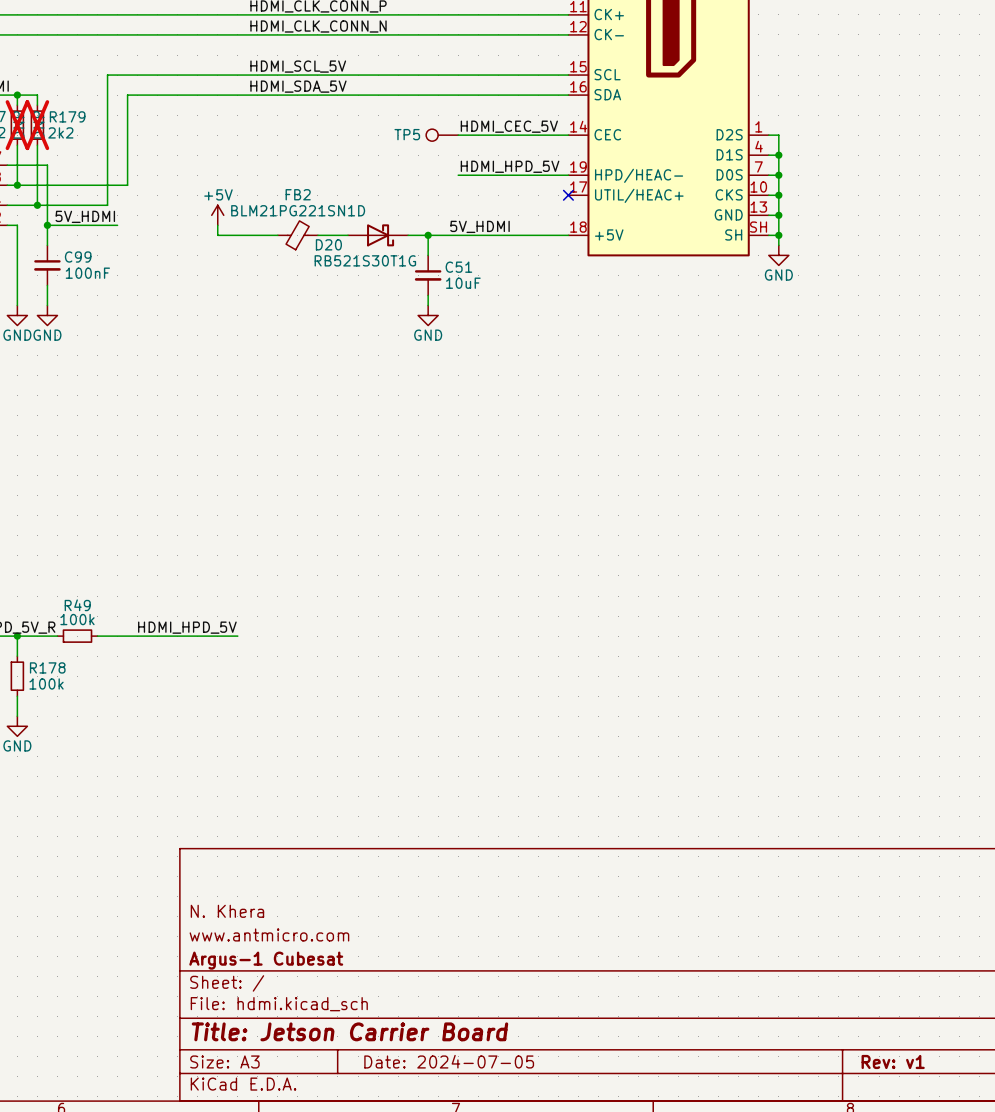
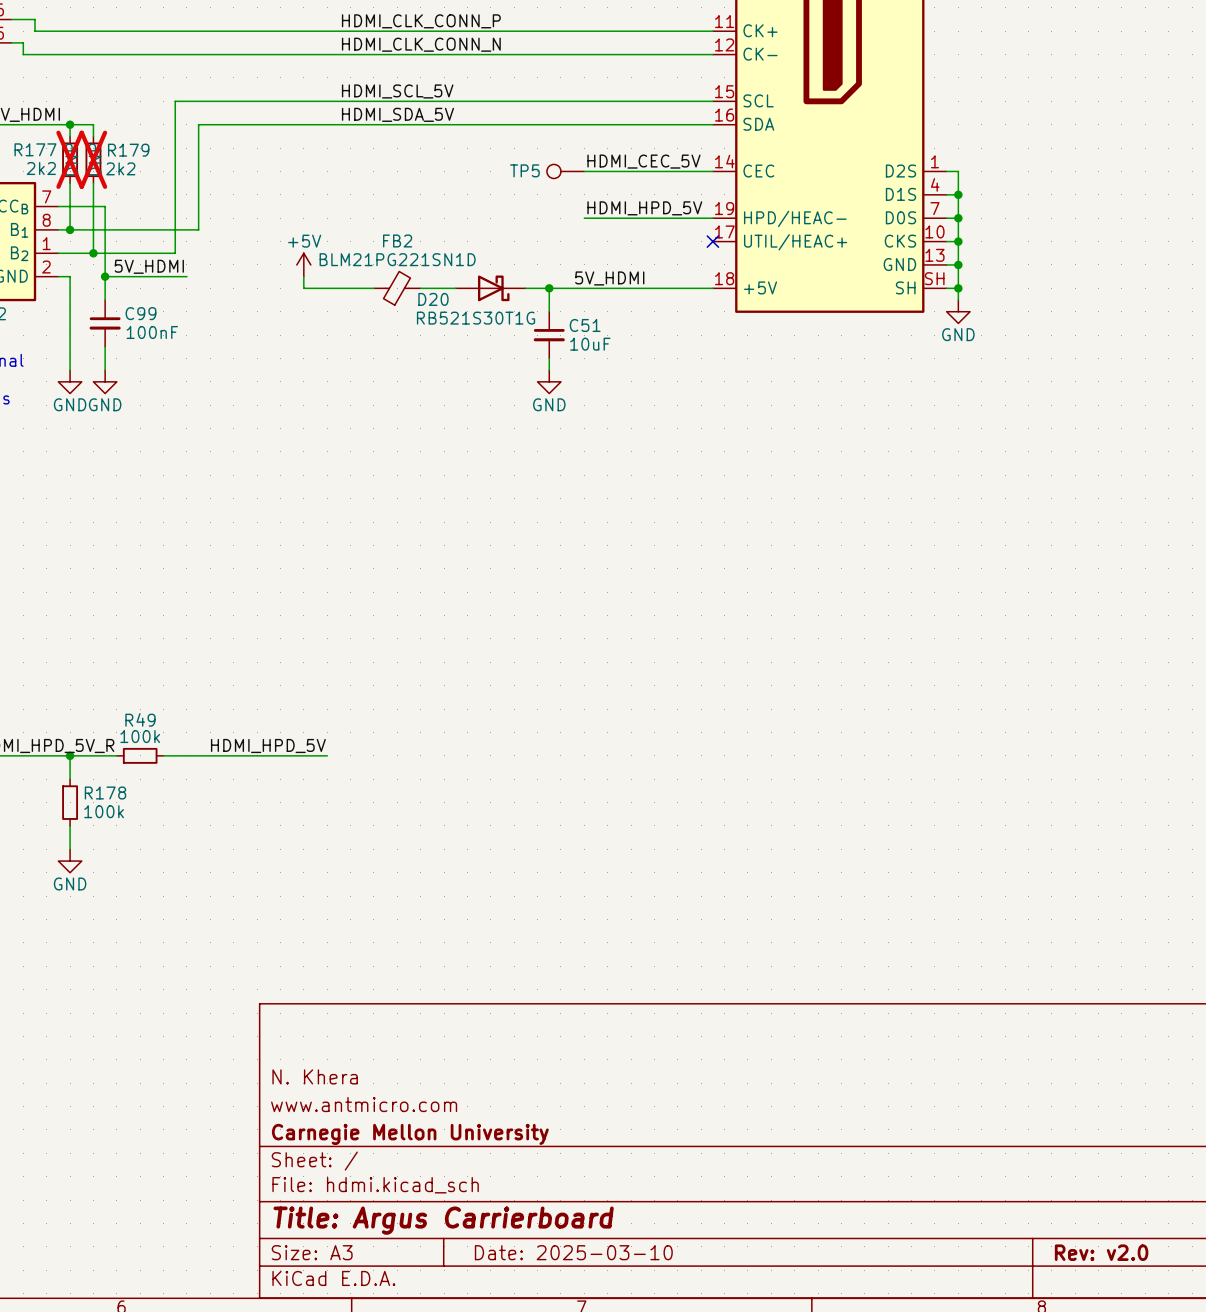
title block: Argus-1 Cubesat (266, 960) -> Carnegie Mellon University (410, 1134)
title block: Title: Jetson Carrier Board (349, 1031) -> Title: Argus Carrierboard (443, 1220)
title block: Date: 2024-07-05 (449, 1061) -> Date: 2025-03-10 (573, 1252)
title block: Rev: v1 (893, 1061) -> Rev: v2.0 (1101, 1252)

